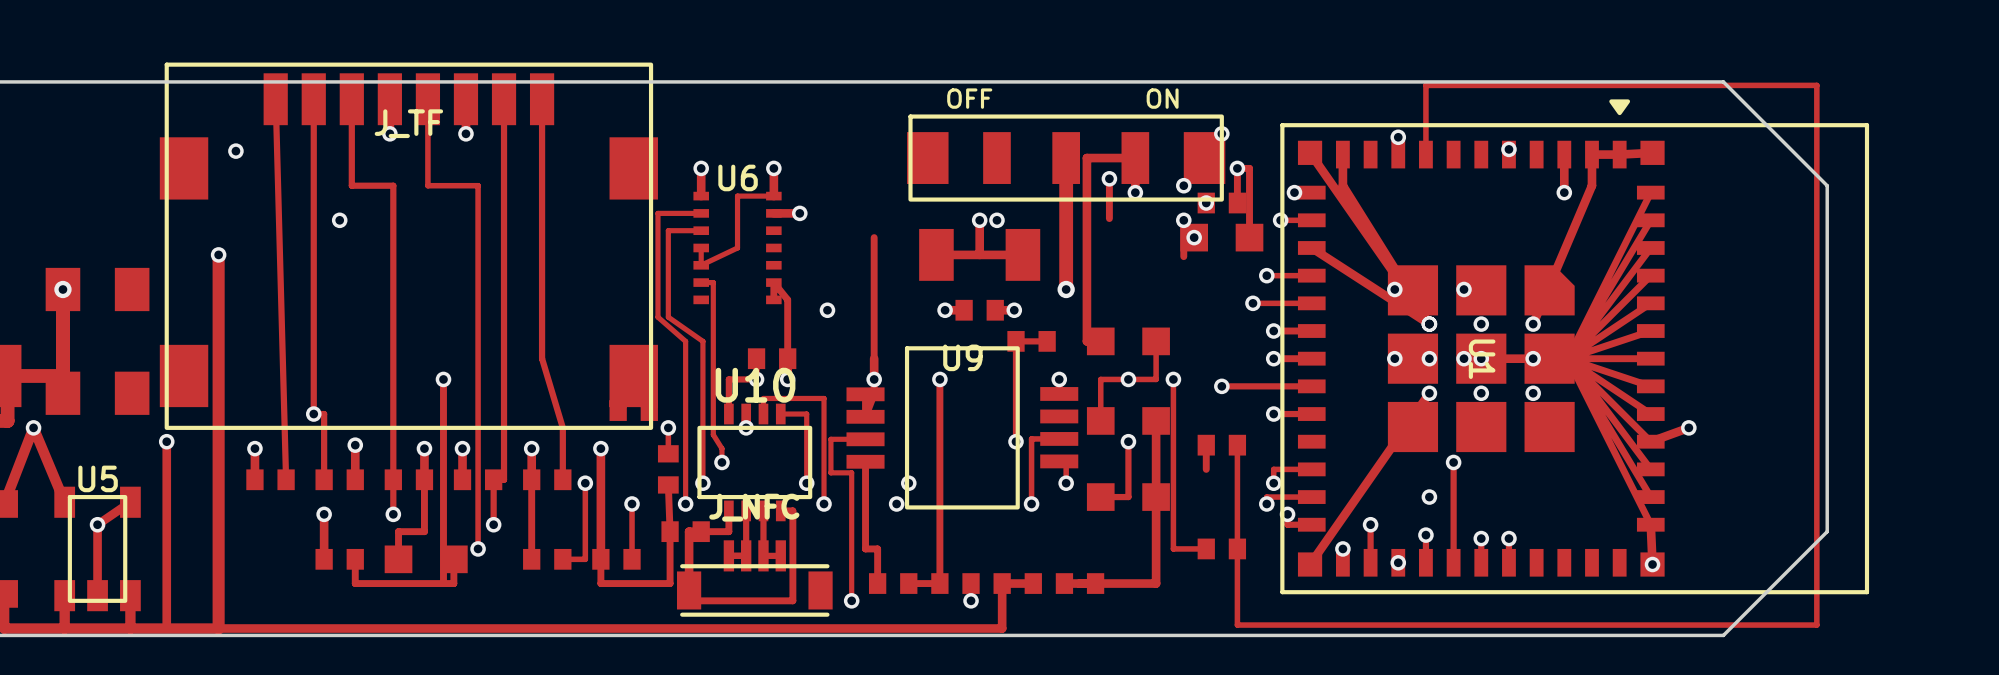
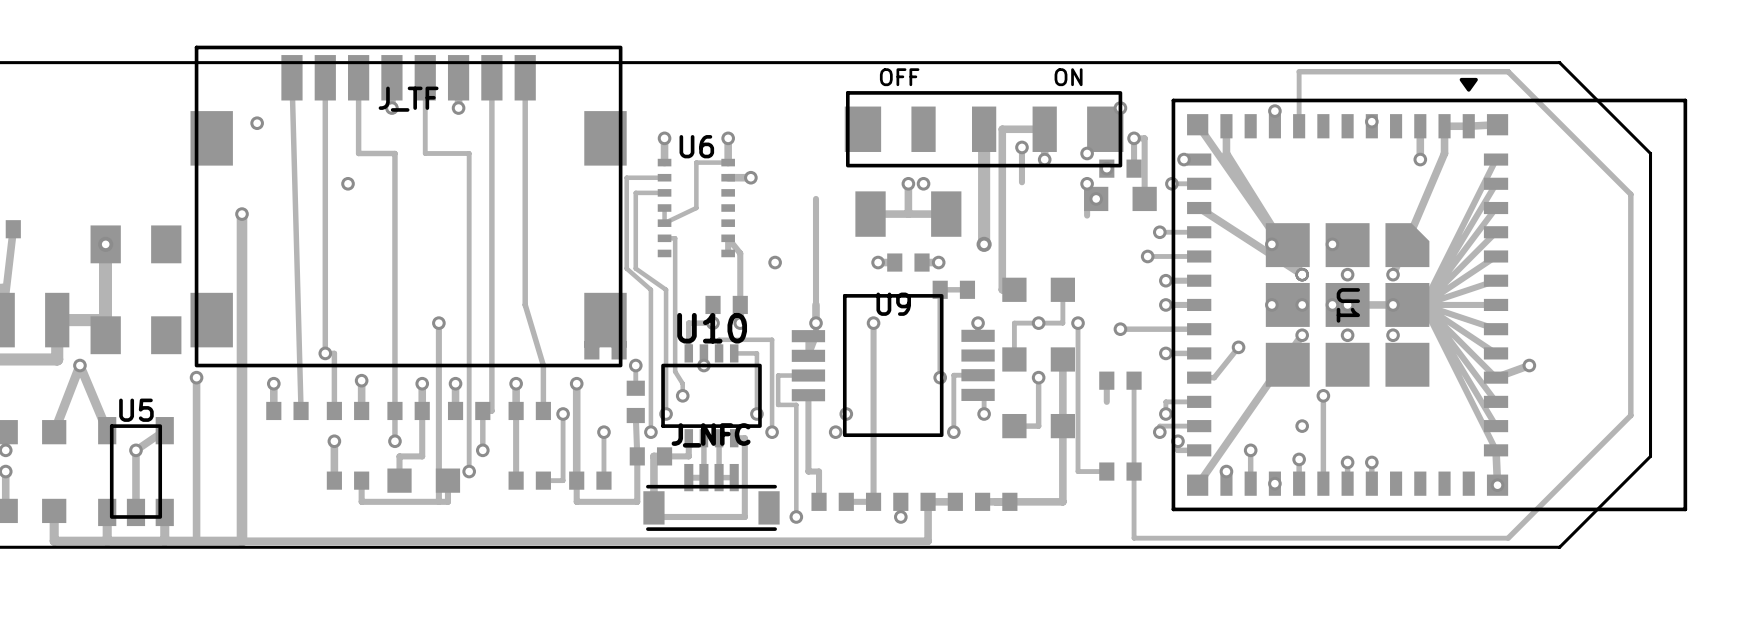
track: (1425, 92) (1425, 85) (1816, 85) (1816, 625) (1664, 625) -> (1299, 71) (1508, 71) (1630, 194) (1630, 415) (1508, 538)
track: none -> (1238, 347) (1214, 377) (1199, 377)
via: none -> (1238, 347)

